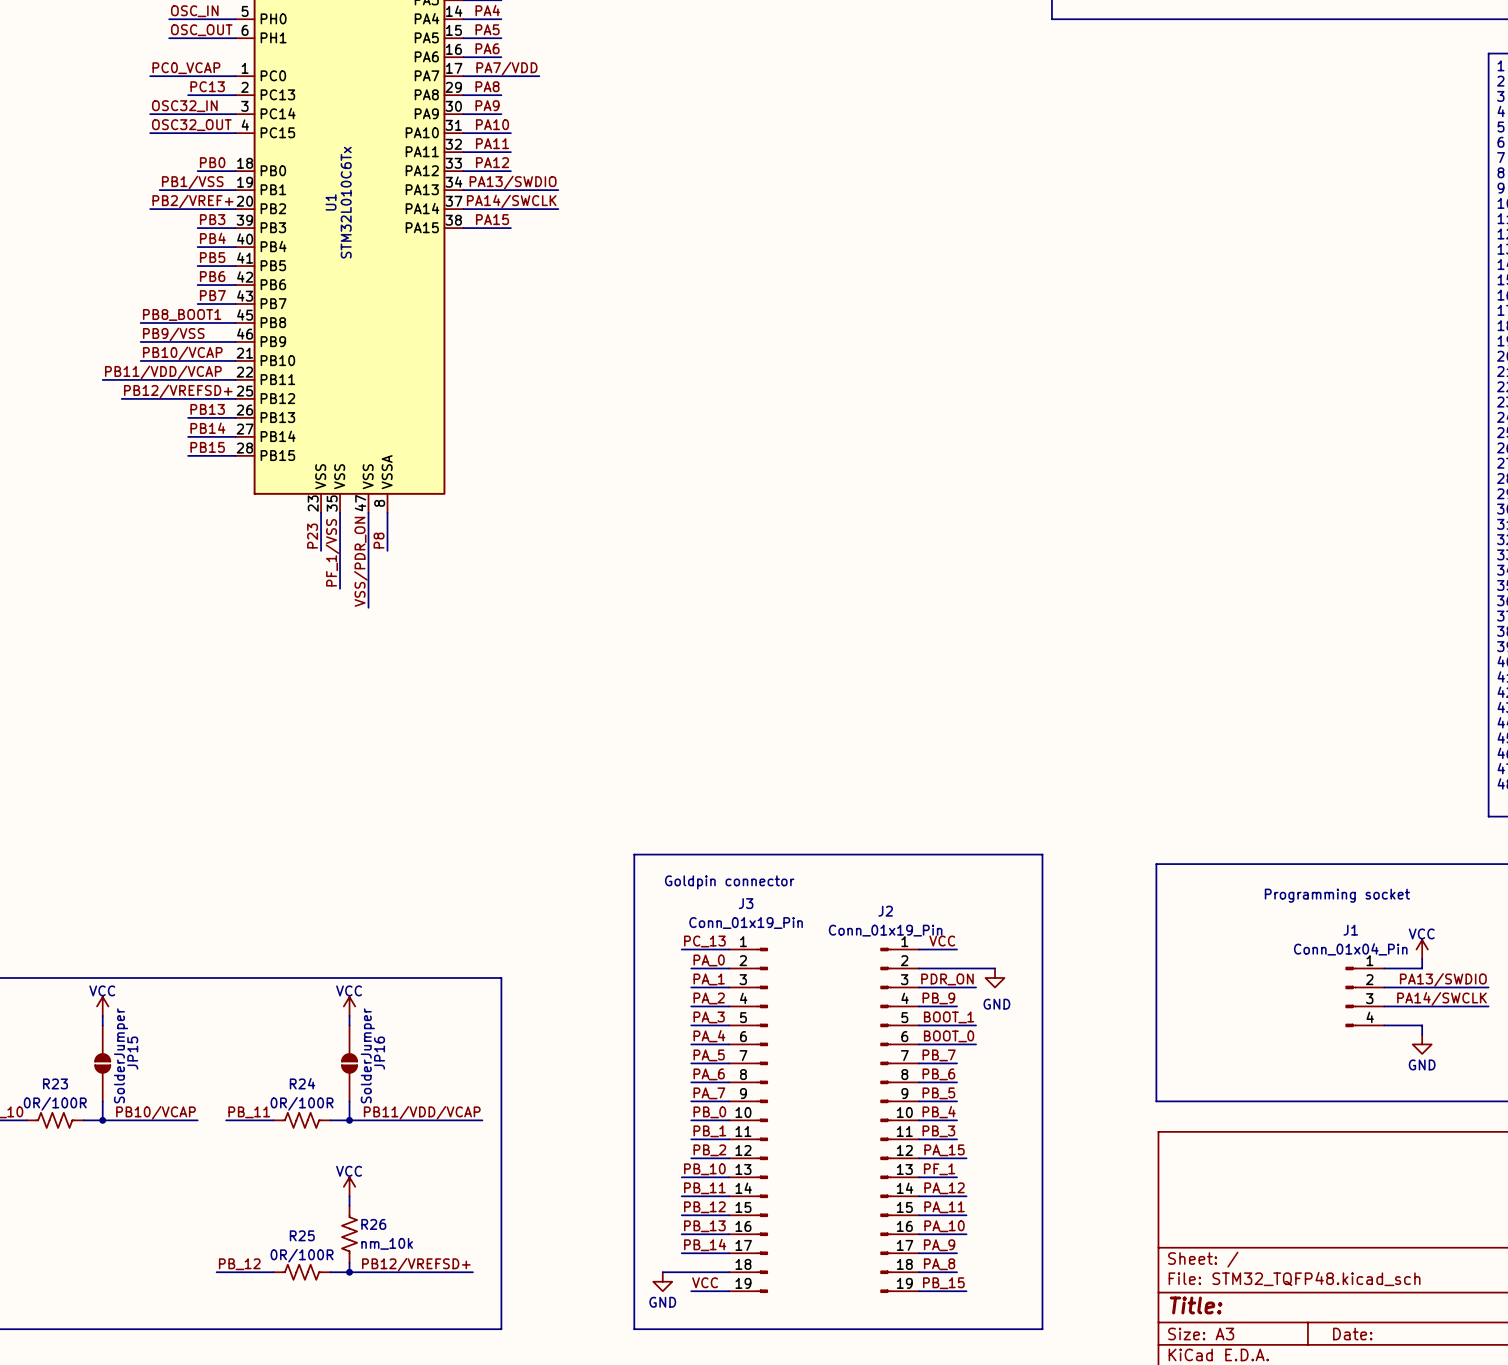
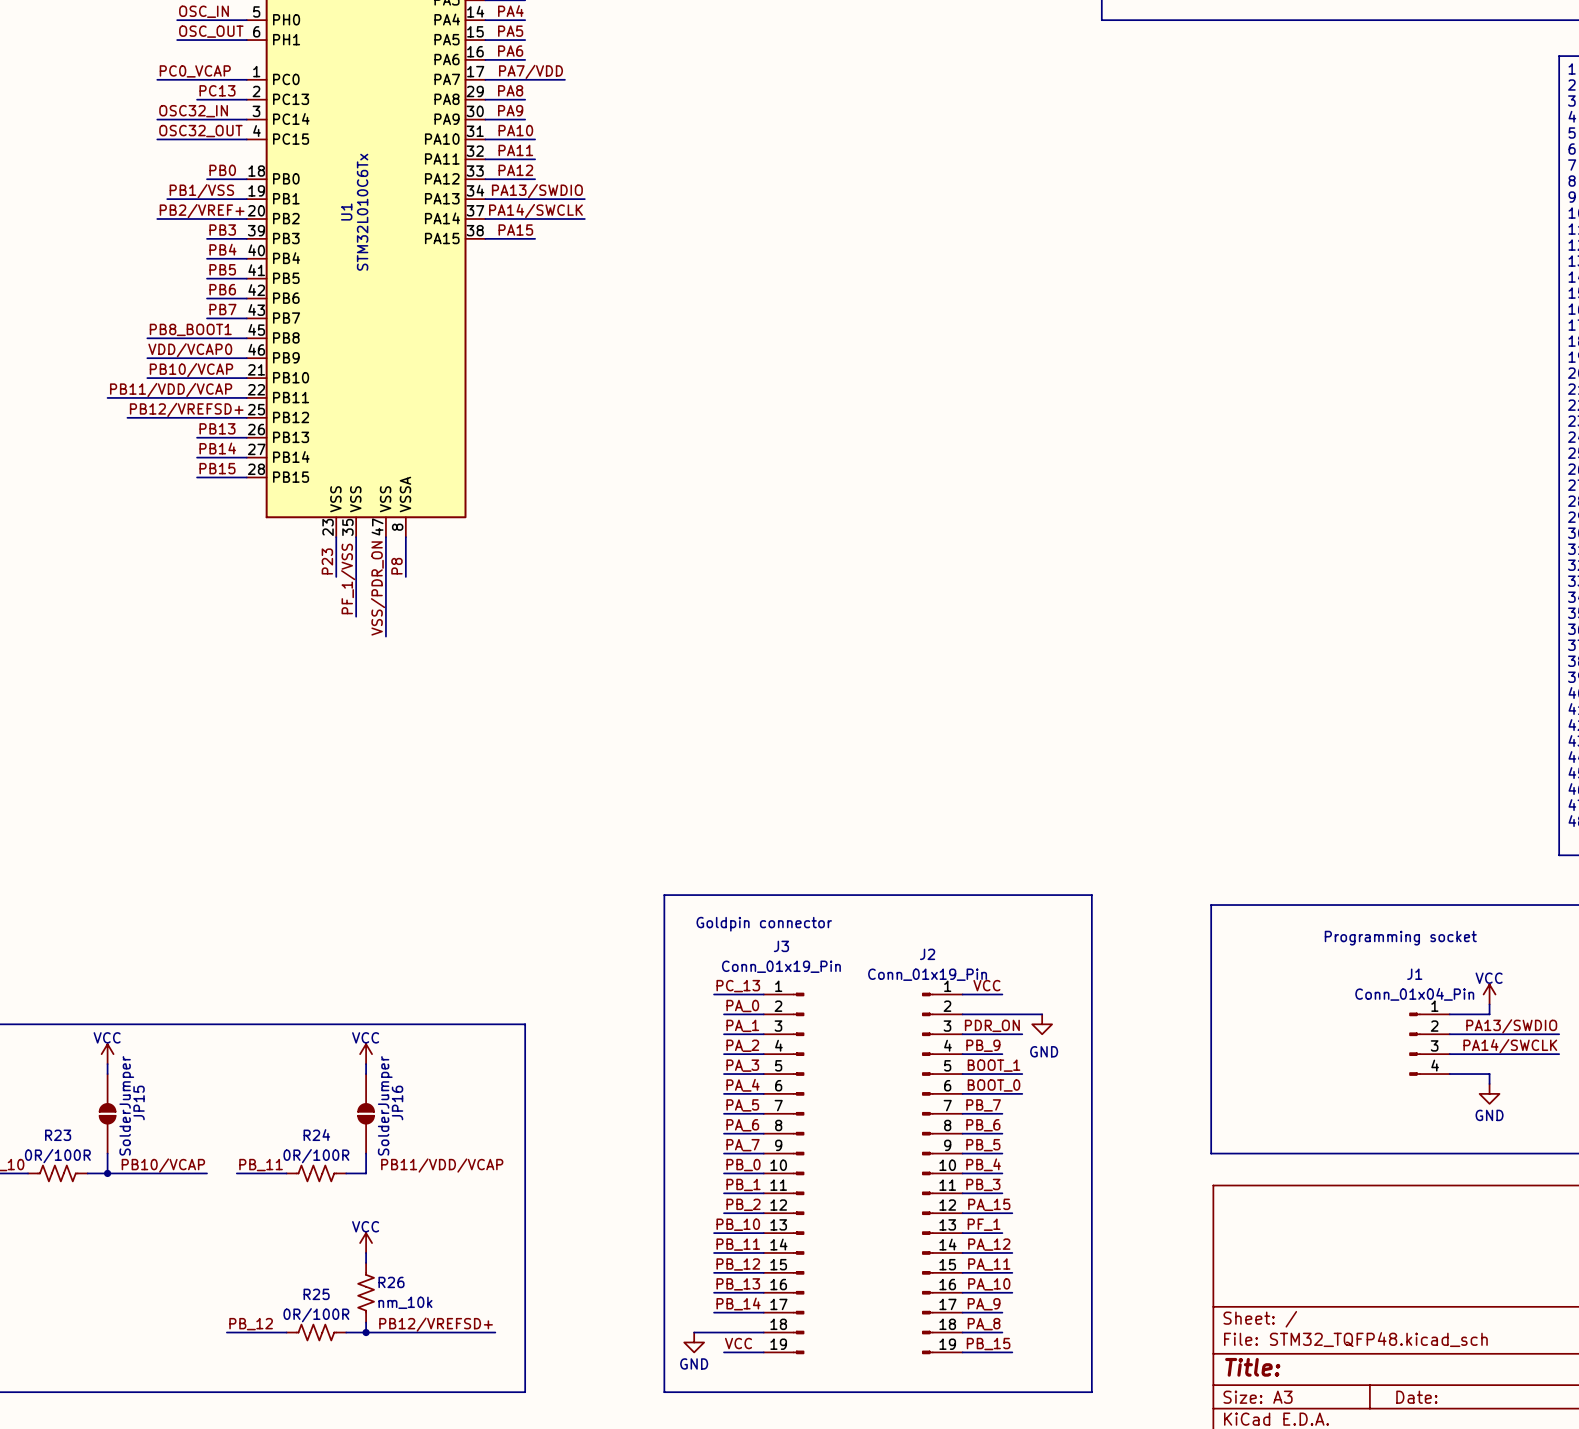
label: PB9/VSS (173, 334) -> VDD/VCAP0 (190, 350)
wire: (349, 1120) (482, 1120) -> none
junction: (349, 1120) -> none

